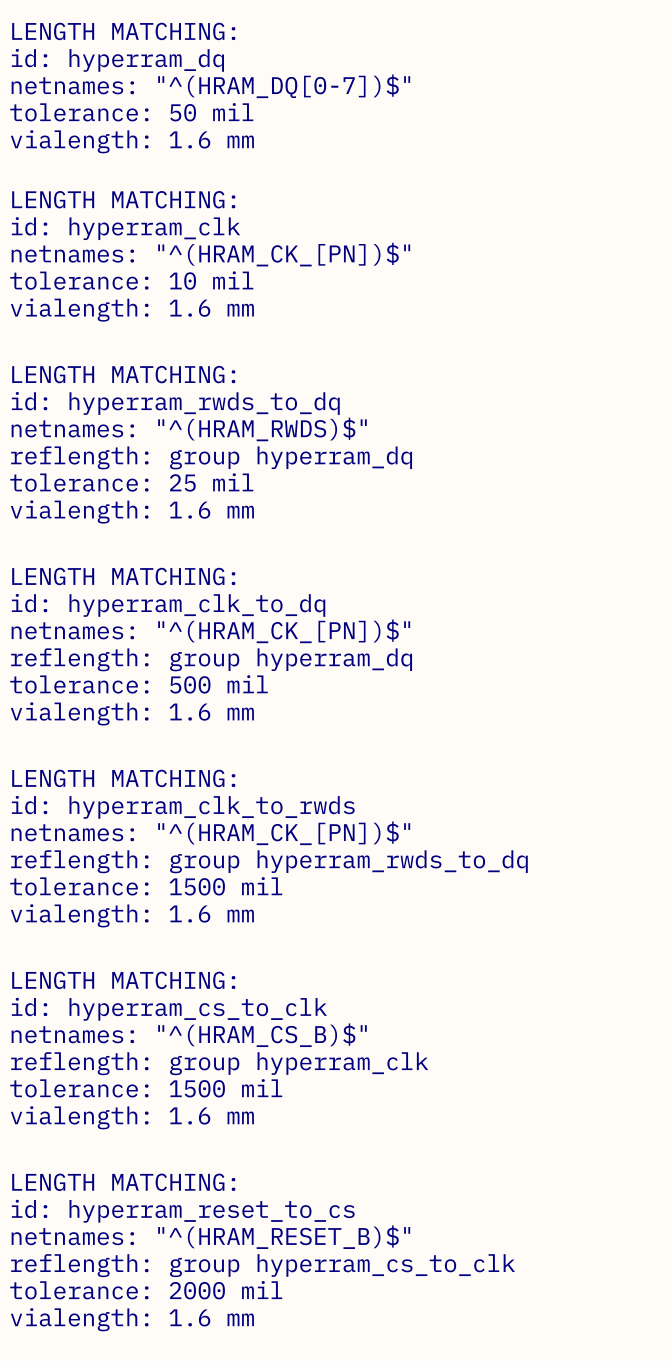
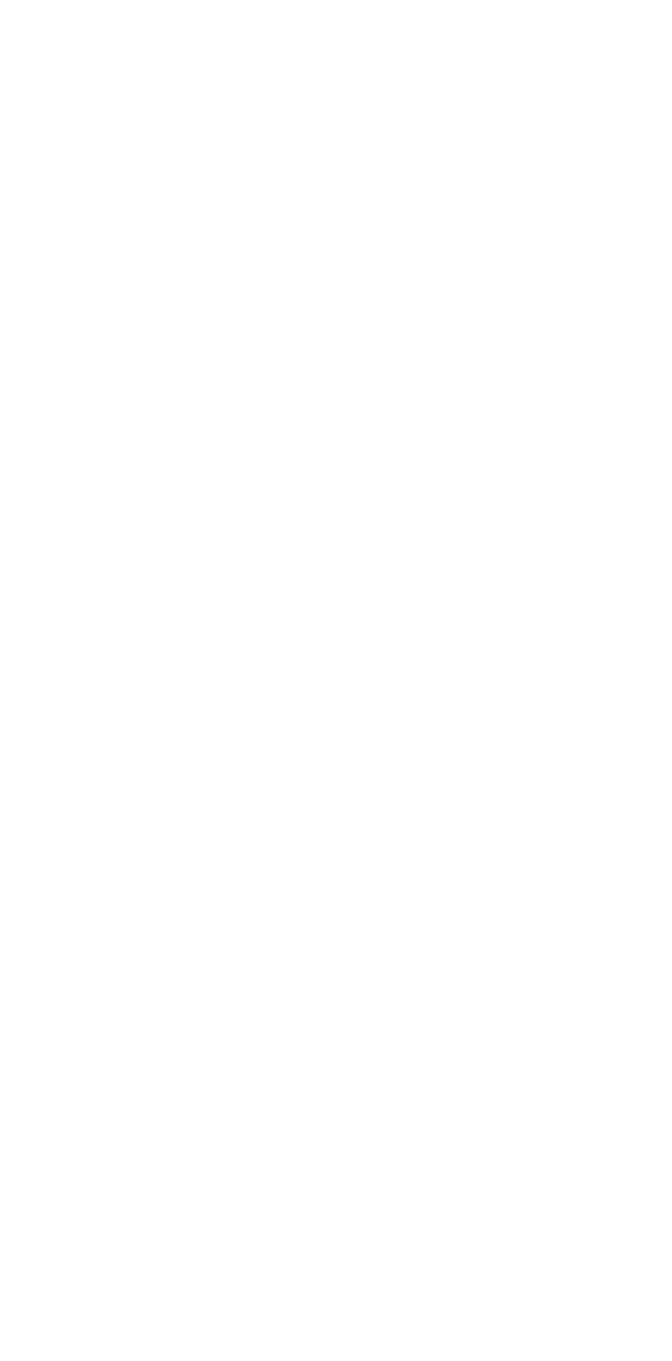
text: LENGTH MATCHING: (123, 31) -> none
text: id: hyperram_dq (117, 60) -> none
text: netnames: "^(HRAM_DQ[0-7])$" (210, 86) -> none
text: tolerance: 50 mil (131, 112) -> none
text: vialength: 1.6 mm (132, 141) -> none
text: LENGTH MATCHING: (123, 199) -> none
text: id: hyperram_clk (125, 228) -> none
text: netnames: "^(HRAM_CK_[PN])$" (210, 254) -> none
text: tolerance: 10 mil (131, 280) -> none
text: vialength: 1.6 mm (132, 310) -> none
text: LENGTH MATCHING: (123, 374) -> none
text: id: hyperram_rwds_to_dq (175, 403) -> none
text: netnames: "^(HRAM_RWDS)$" (189, 429) -> none
text: reflength: group hyperram_dq (211, 457) -> none
text: tolerance: 25 mil (131, 482) -> none
text: vialength: 1.6 mm (132, 511) -> none
text: LENGTH MATCHING: (123, 576) -> none
text: id: hyperram_clk_to_dq (168, 605) -> none
text: netnames: "^(HRAM_CK_[PN])$" (210, 631) -> none
text: reflength: group hyperram_dq (211, 659) -> none
text: tolerance: 500 mil (139, 684) -> none
text: vialength: 1.6 mm (132, 713) -> none
text: LENGTH MATCHING: (123, 778) -> none
text: id: hyperram_clk_to_rwds (183, 807) -> none
text: netnames: "^(HRAM_CK_[PN])$" (210, 833) -> none
text: reflength: group hyperram_rwds_to_dq (269, 861) -> none
text: tolerance: 1500 mil (146, 886) -> none
text: vialength: 1.6 mm (132, 915) -> none
text: LENGTH MATCHING: (123, 980) -> none
text: id: hyperram_cs_to_clk (169, 1009) -> none
text: netnames: "^(HRAM_CS_B)$" (189, 1035) -> none
text: reflength: group hyperram_clk (219, 1063) -> none
text: tolerance: 1500 mil (146, 1088) -> none
text: vialength: 1.6 mm (132, 1117) -> none
text: LENGTH MATCHING: (123, 1182) -> none
text: id: hyperram_reset_to_cs (183, 1211) -> none
text: netnames: "^(HRAM_RESET_B)$" (210, 1237) -> none
text: reflength: group hyperram_cs_to_clk (263, 1265) -> none
text: tolerance: 2000 mil (146, 1290) -> none
text: vialength: 1.6 mm (132, 1319) -> none

